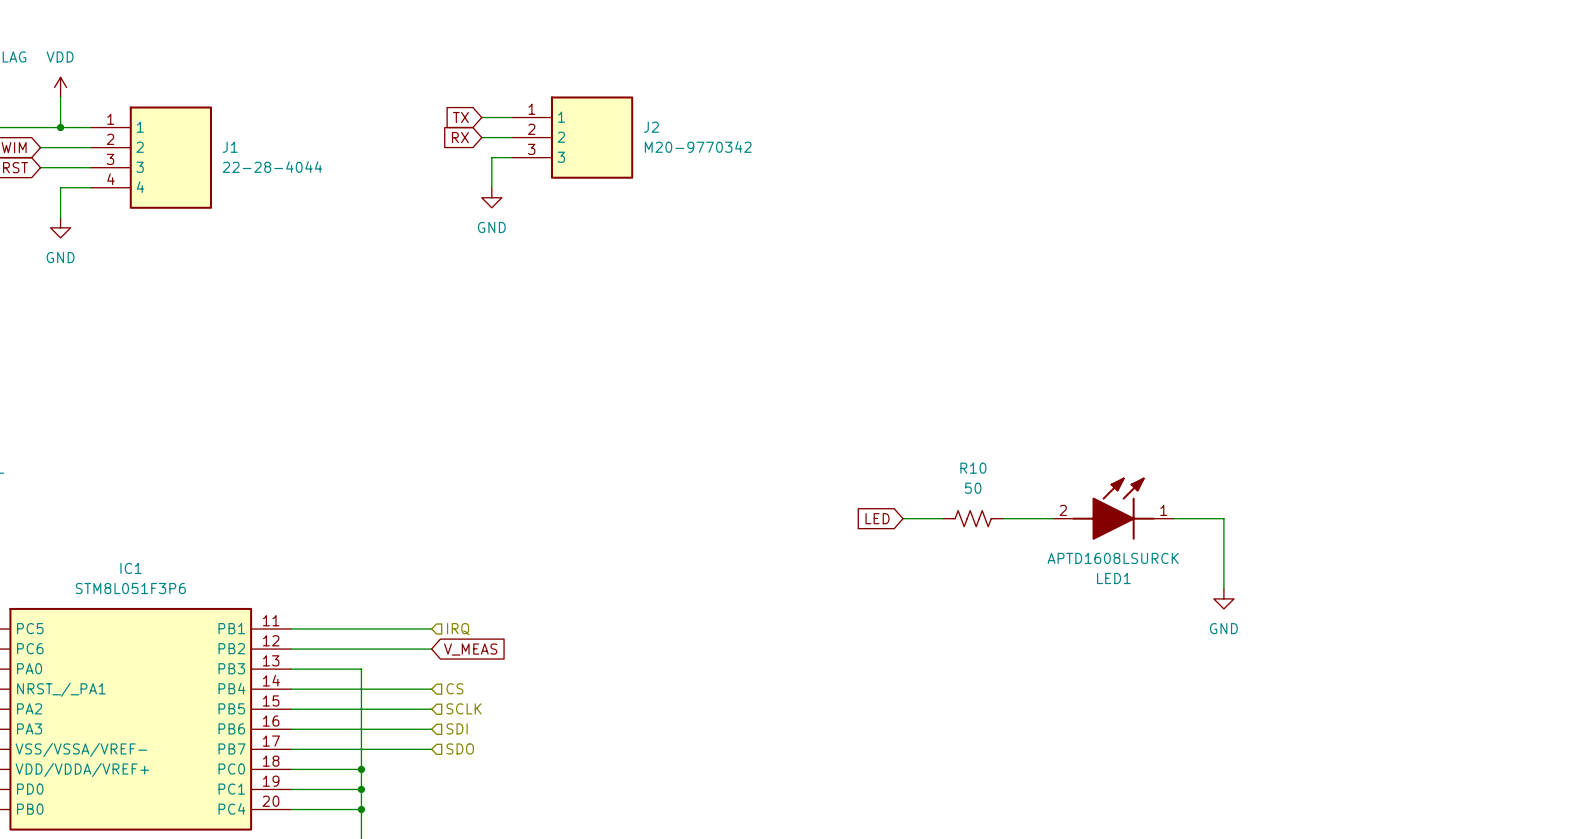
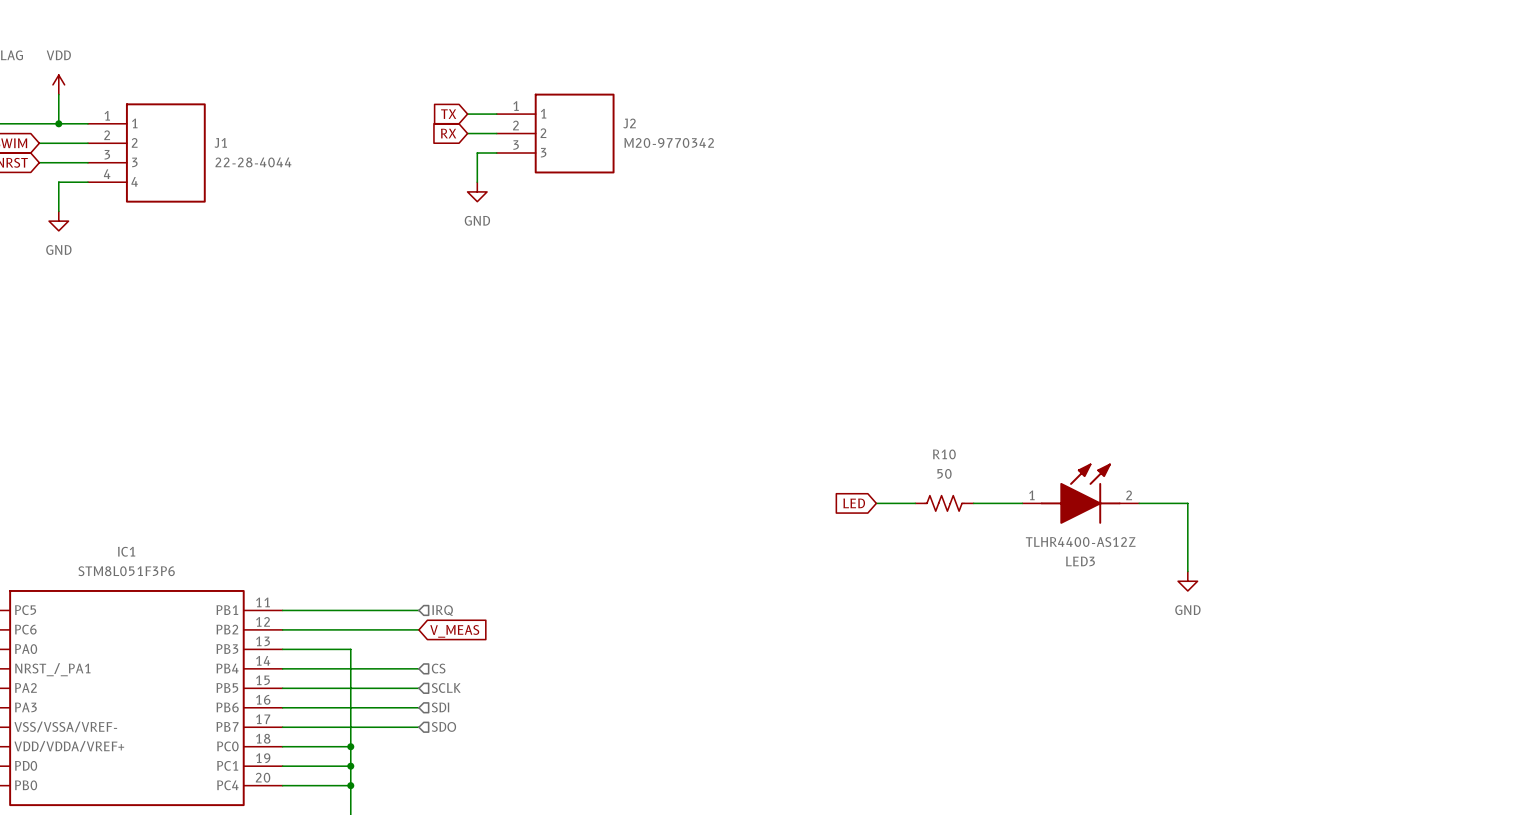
LED1 pin number: 2 (1063, 510) -> 1 (1031, 495)
LED1 pin number: 1 (1163, 510) -> 2 (1129, 495)
LED1 value: APTD1608LSURCK (1113, 558) -> TLHR4400-AS12Z (1080, 542)
LED1 name: LED1 (1113, 578) -> LED3 (1080, 561)

